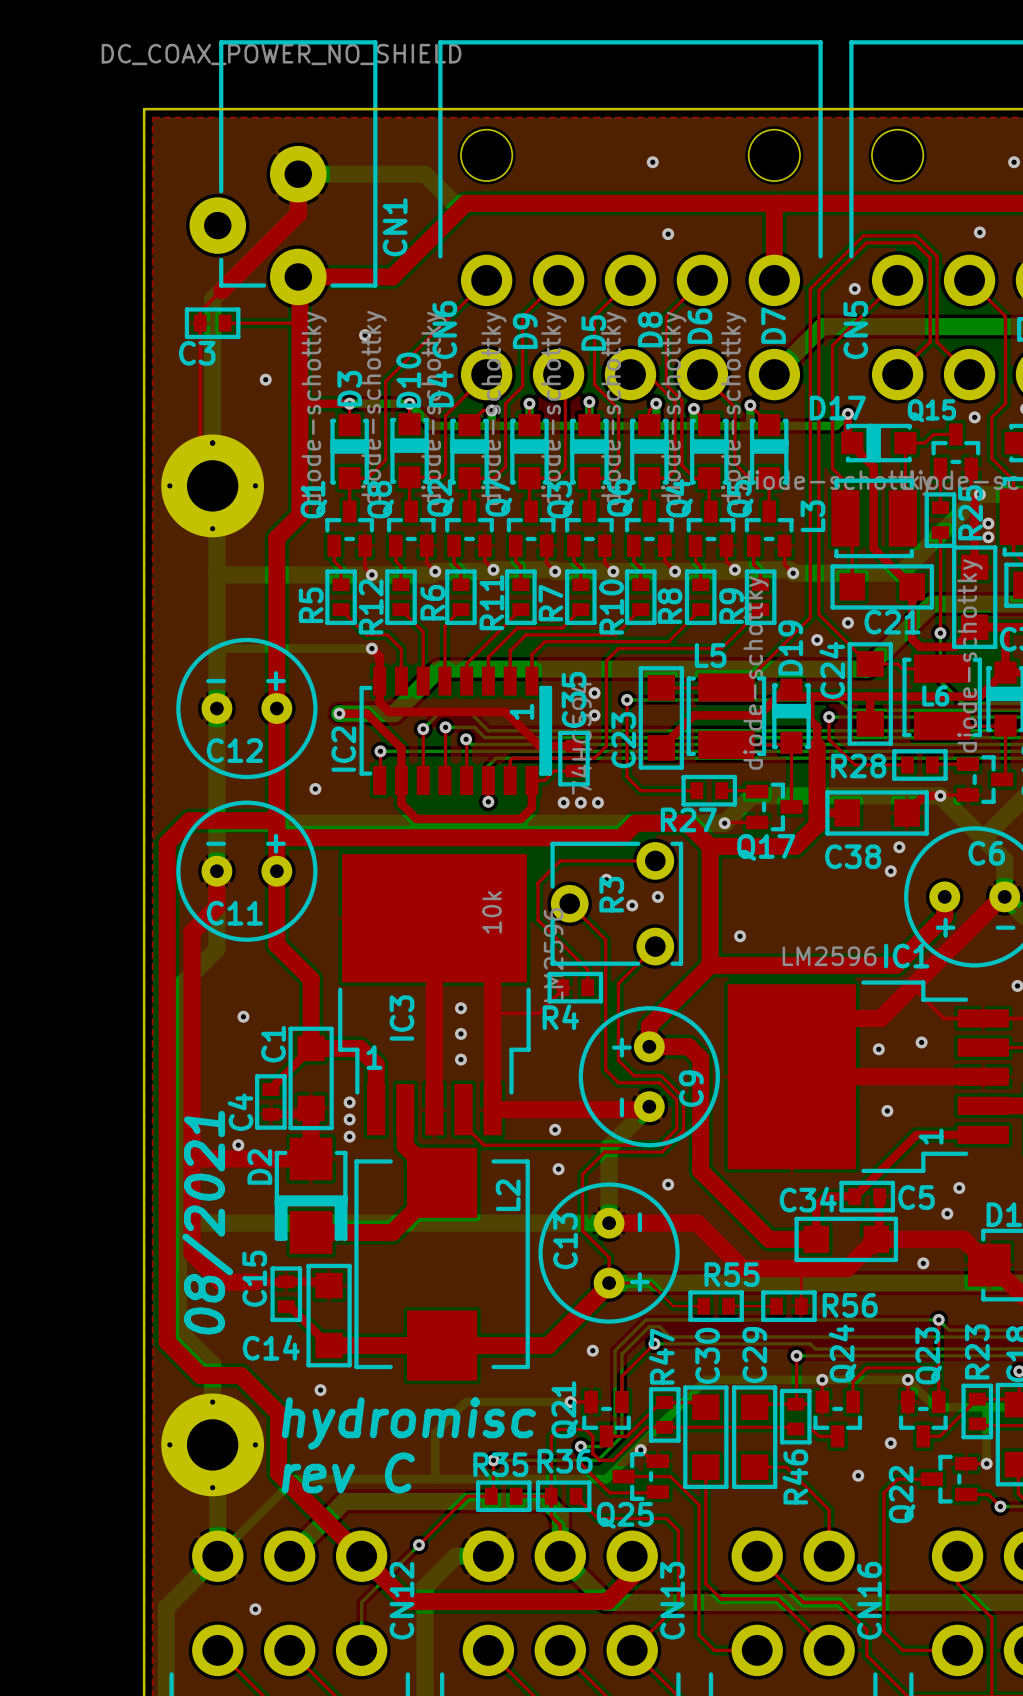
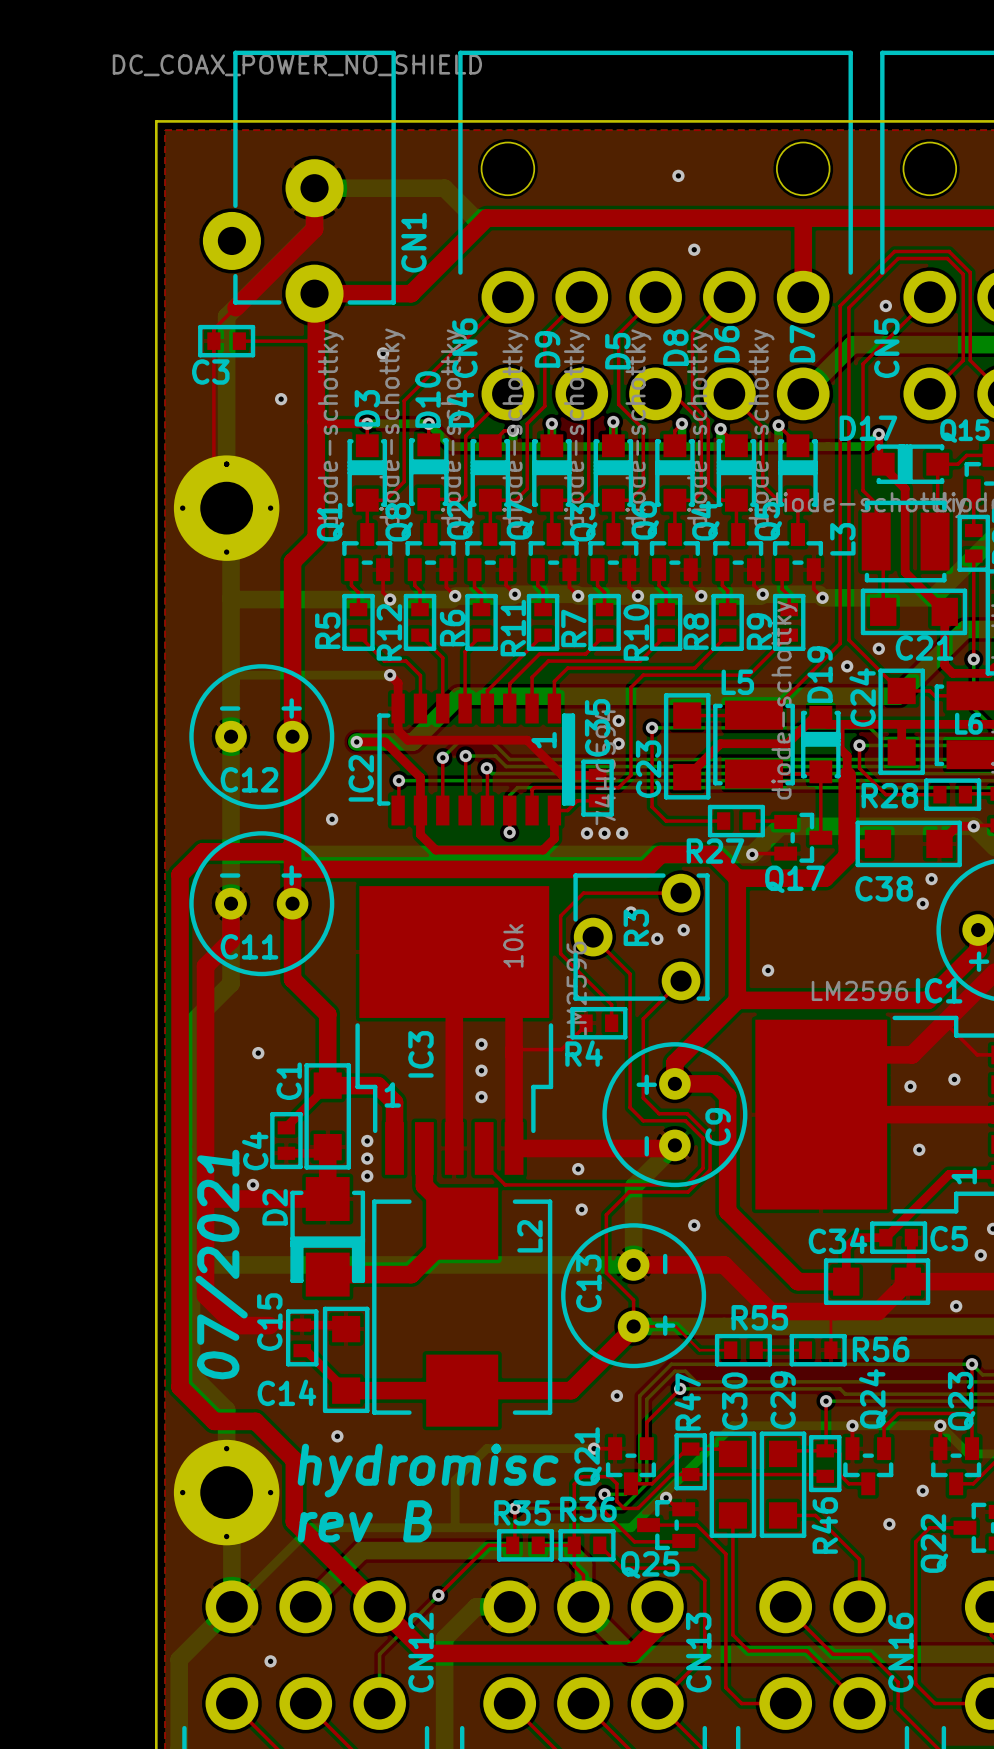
text: 08/2021 (207, 1222) -> 07/2021 (221, 1264)
text: rev C (348, 1472) -> rev B (364, 1521)

